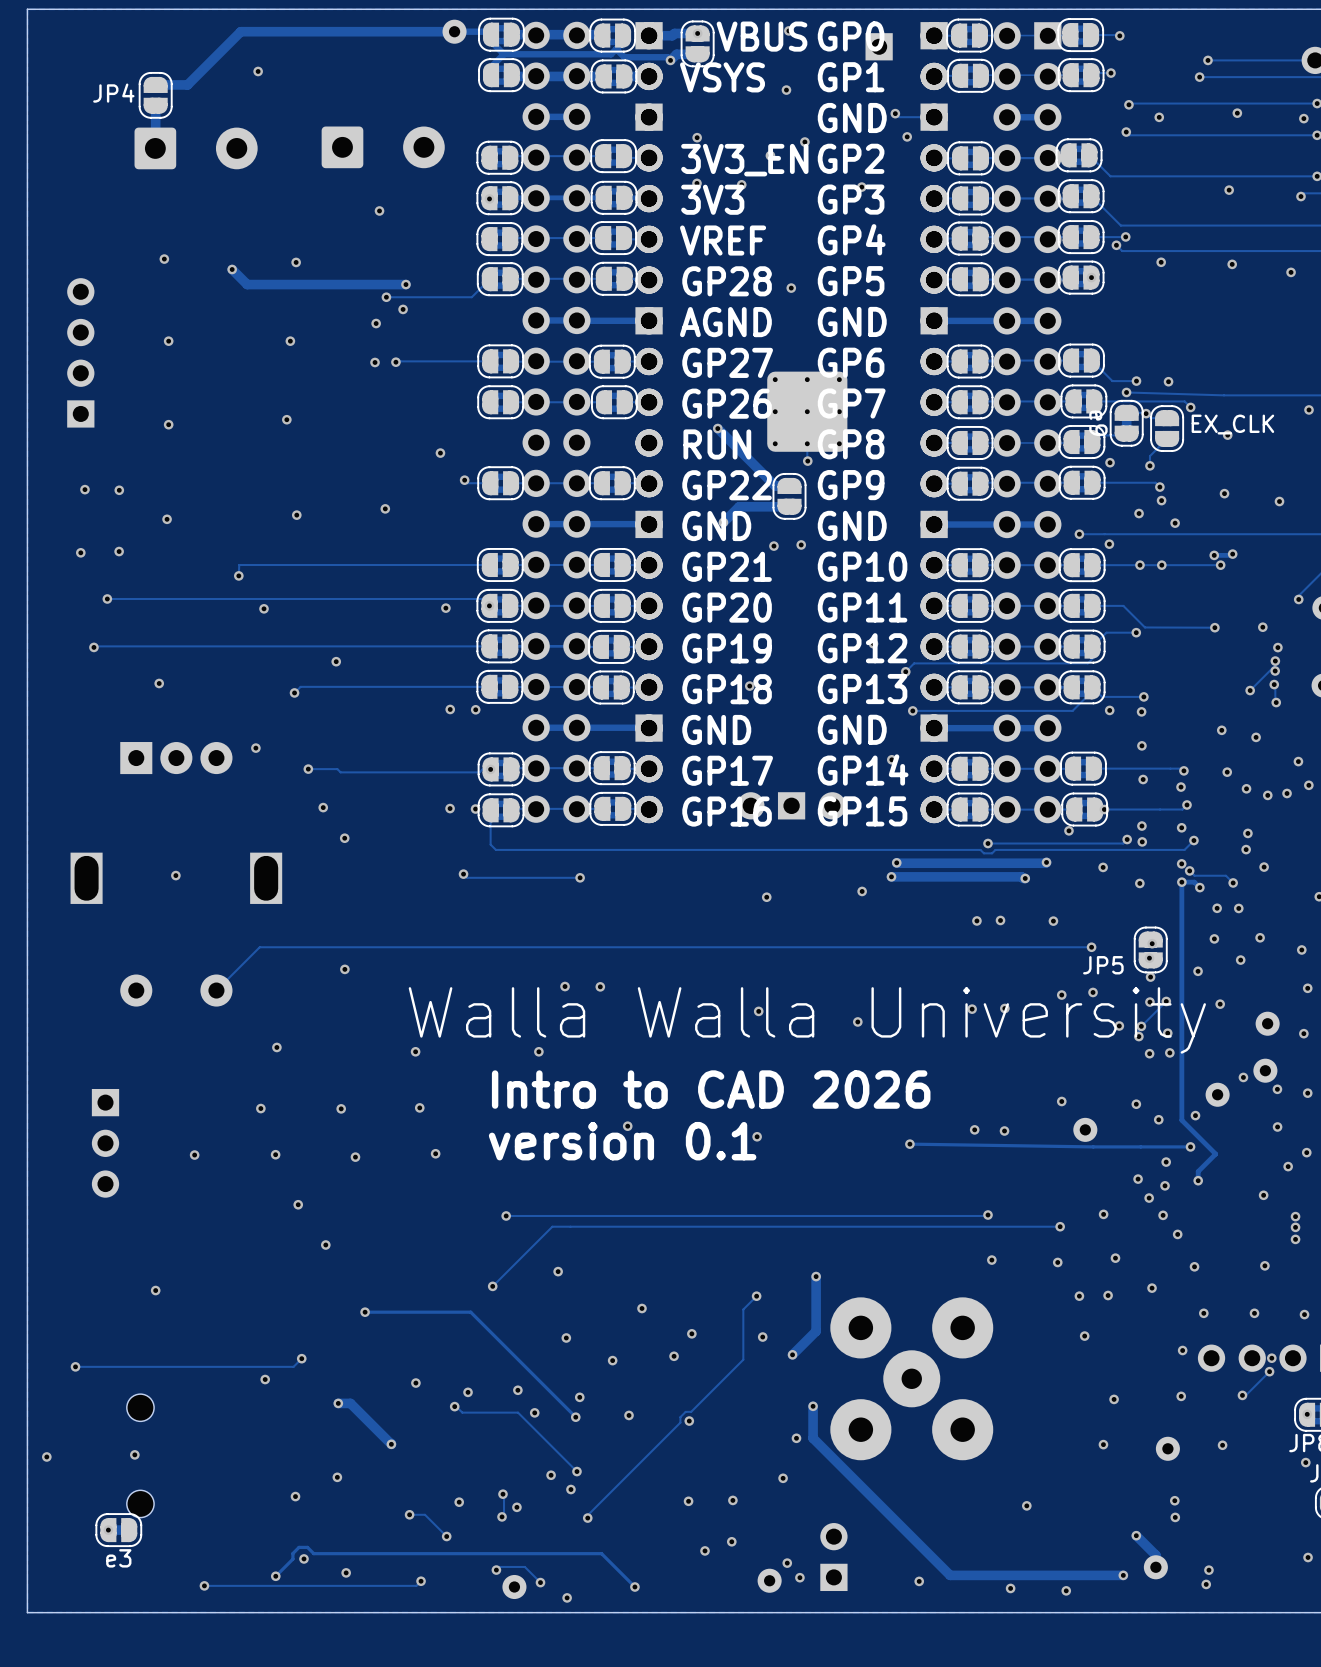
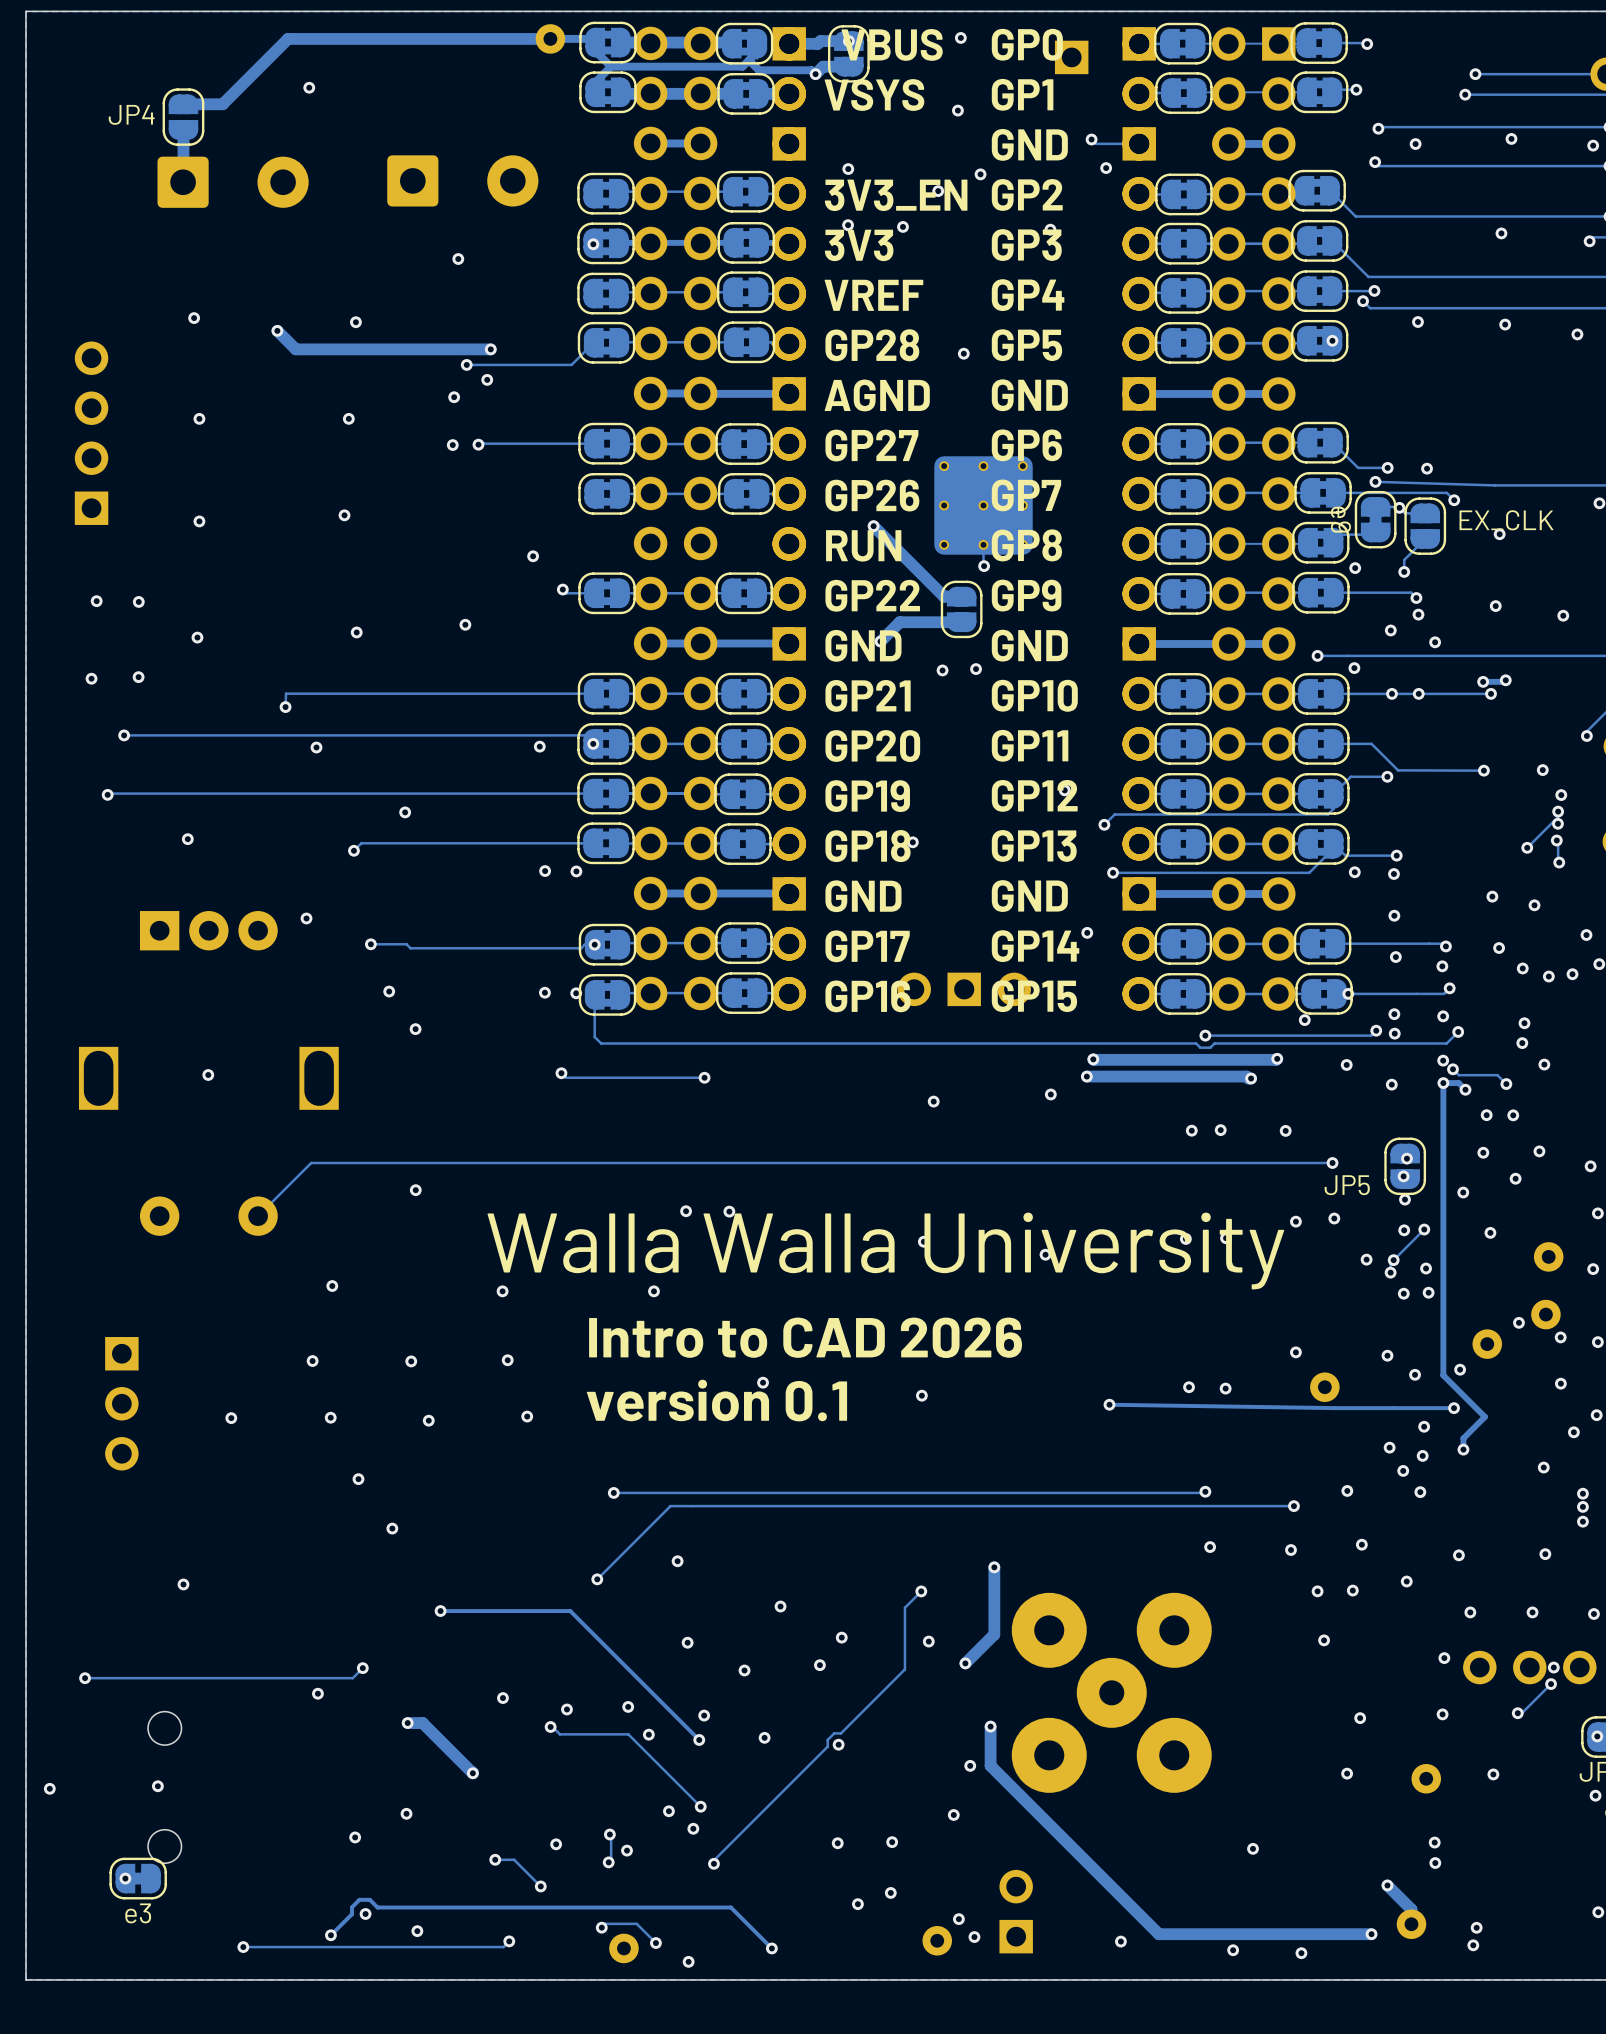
via: (1177, 1234) -> none

